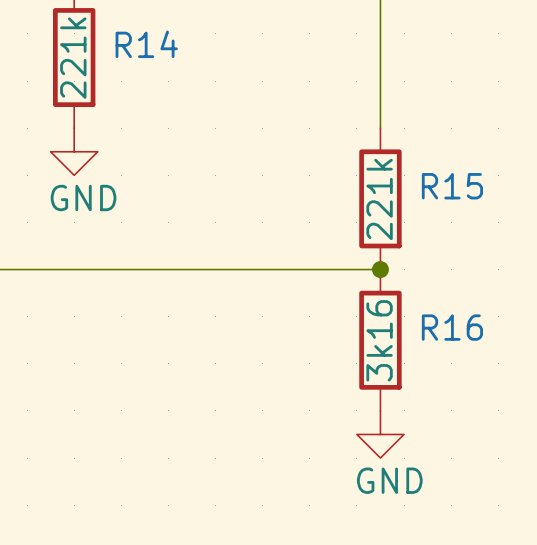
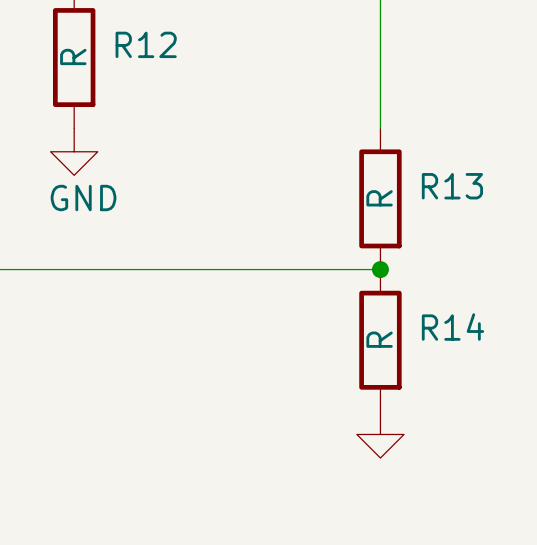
R14 name: R14 (146, 44) -> R12 (146, 44)
R14 value: 221k (73, 58) -> R (73, 56)
R15 name: R15 (452, 186) -> R13 (452, 186)
R15 value: 221k (379, 199) -> R (379, 198)
R16 name: R16 (452, 327) -> R14 (452, 327)
R16 value: 3k16 (379, 340) -> R (379, 339)
power symbol text: GND (389, 480) -> none

